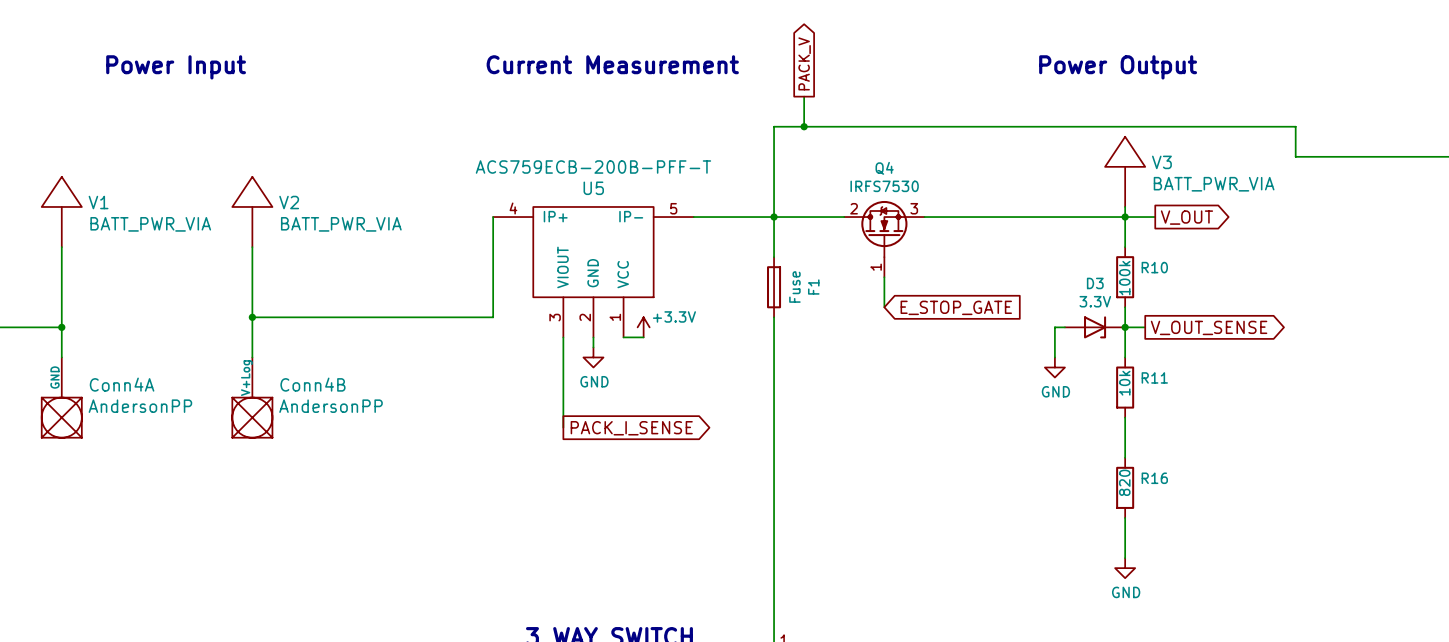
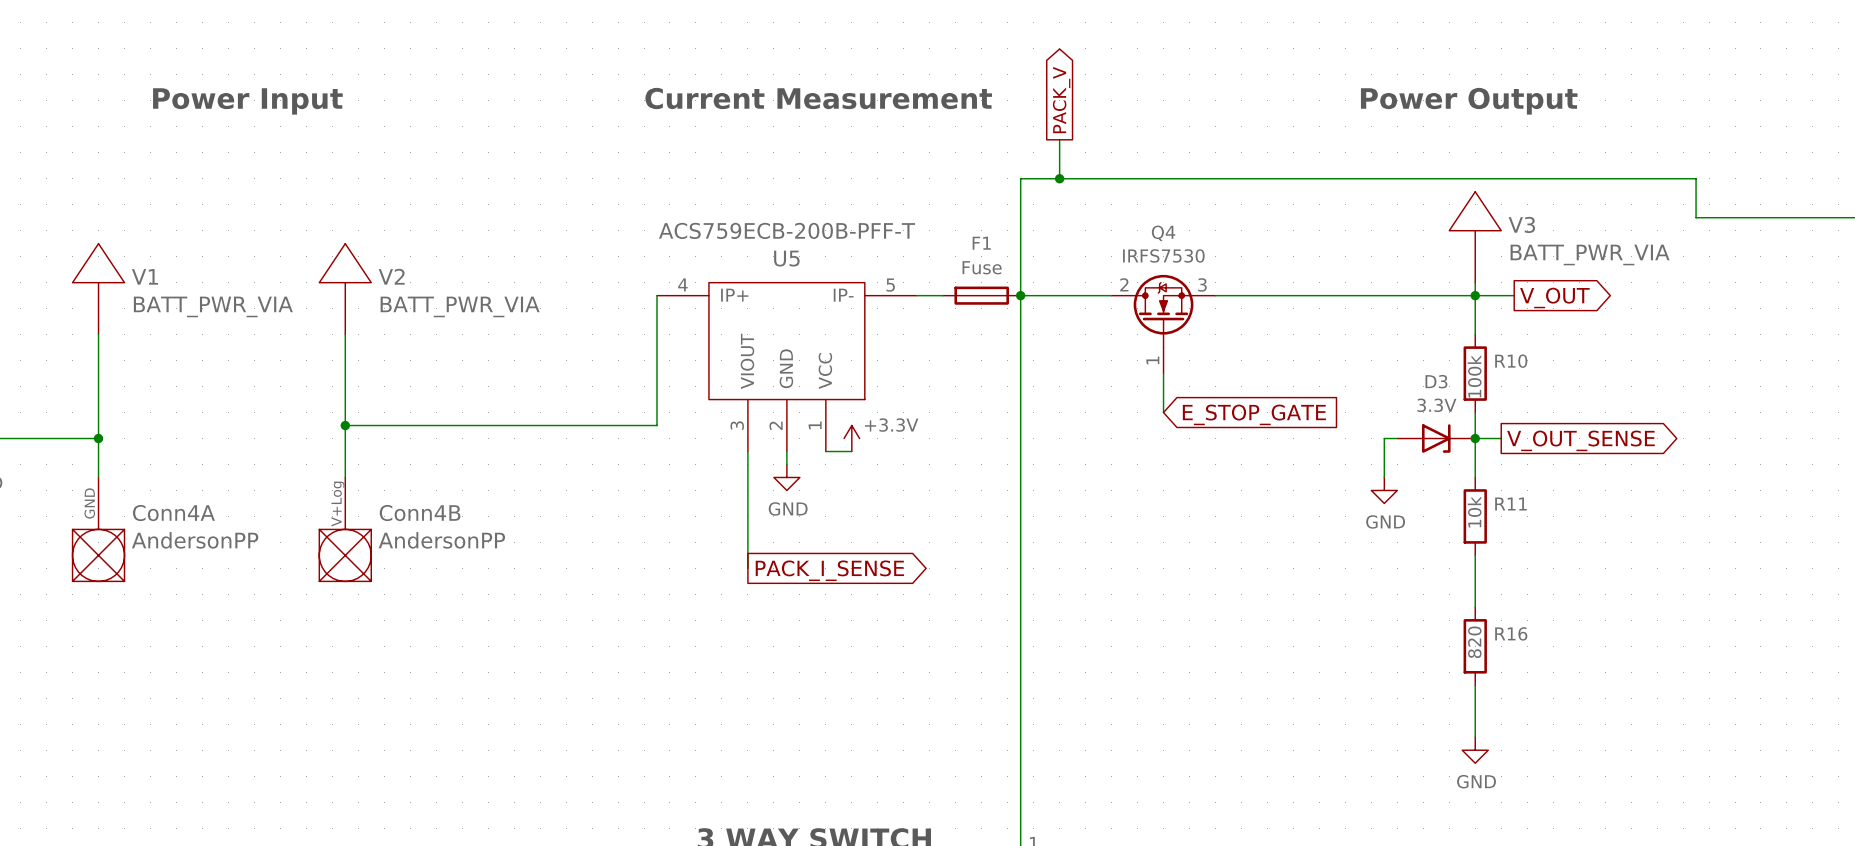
F1 rotation: 0° (774, 287) -> 90° clockwise (981, 295)
F1 position: (774, 287) -> (981, 295)
F1 value position: Fuse (794, 287) -> Fuse (982, 267)
F1 name position: F1 (813, 287) -> F1 (981, 243)

